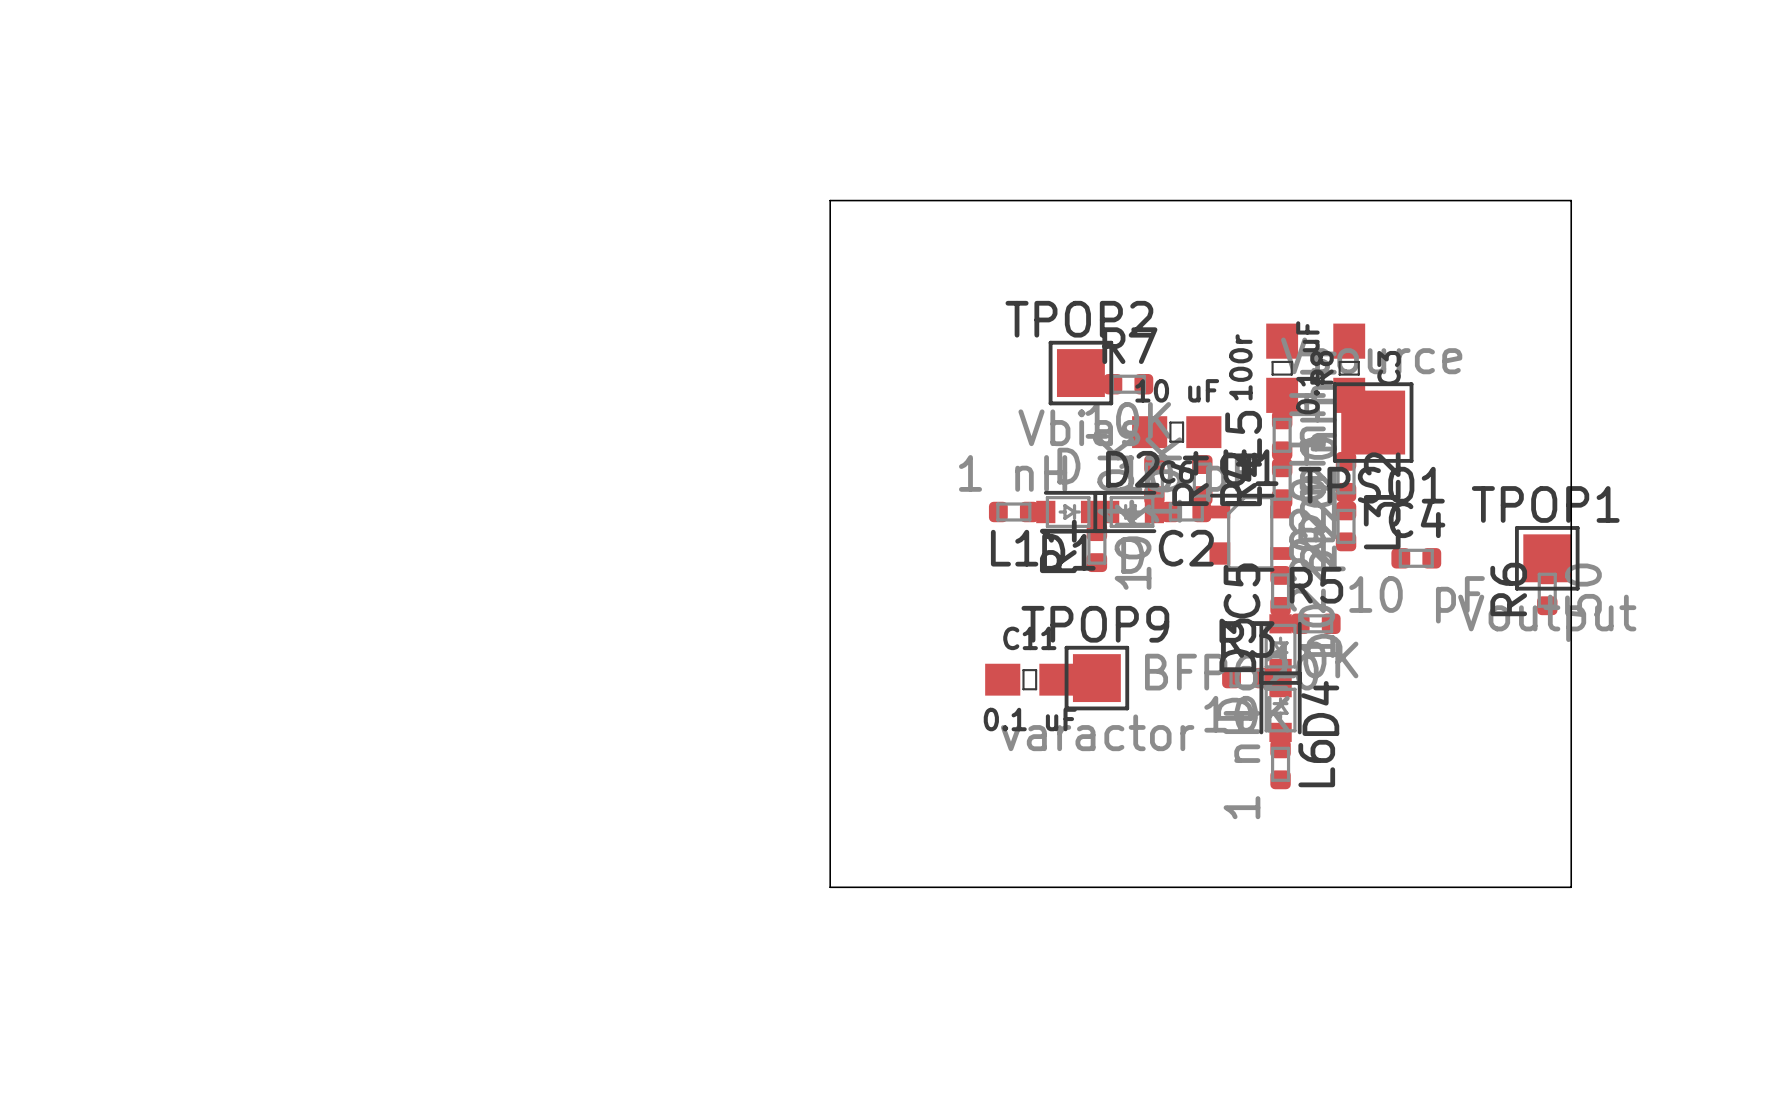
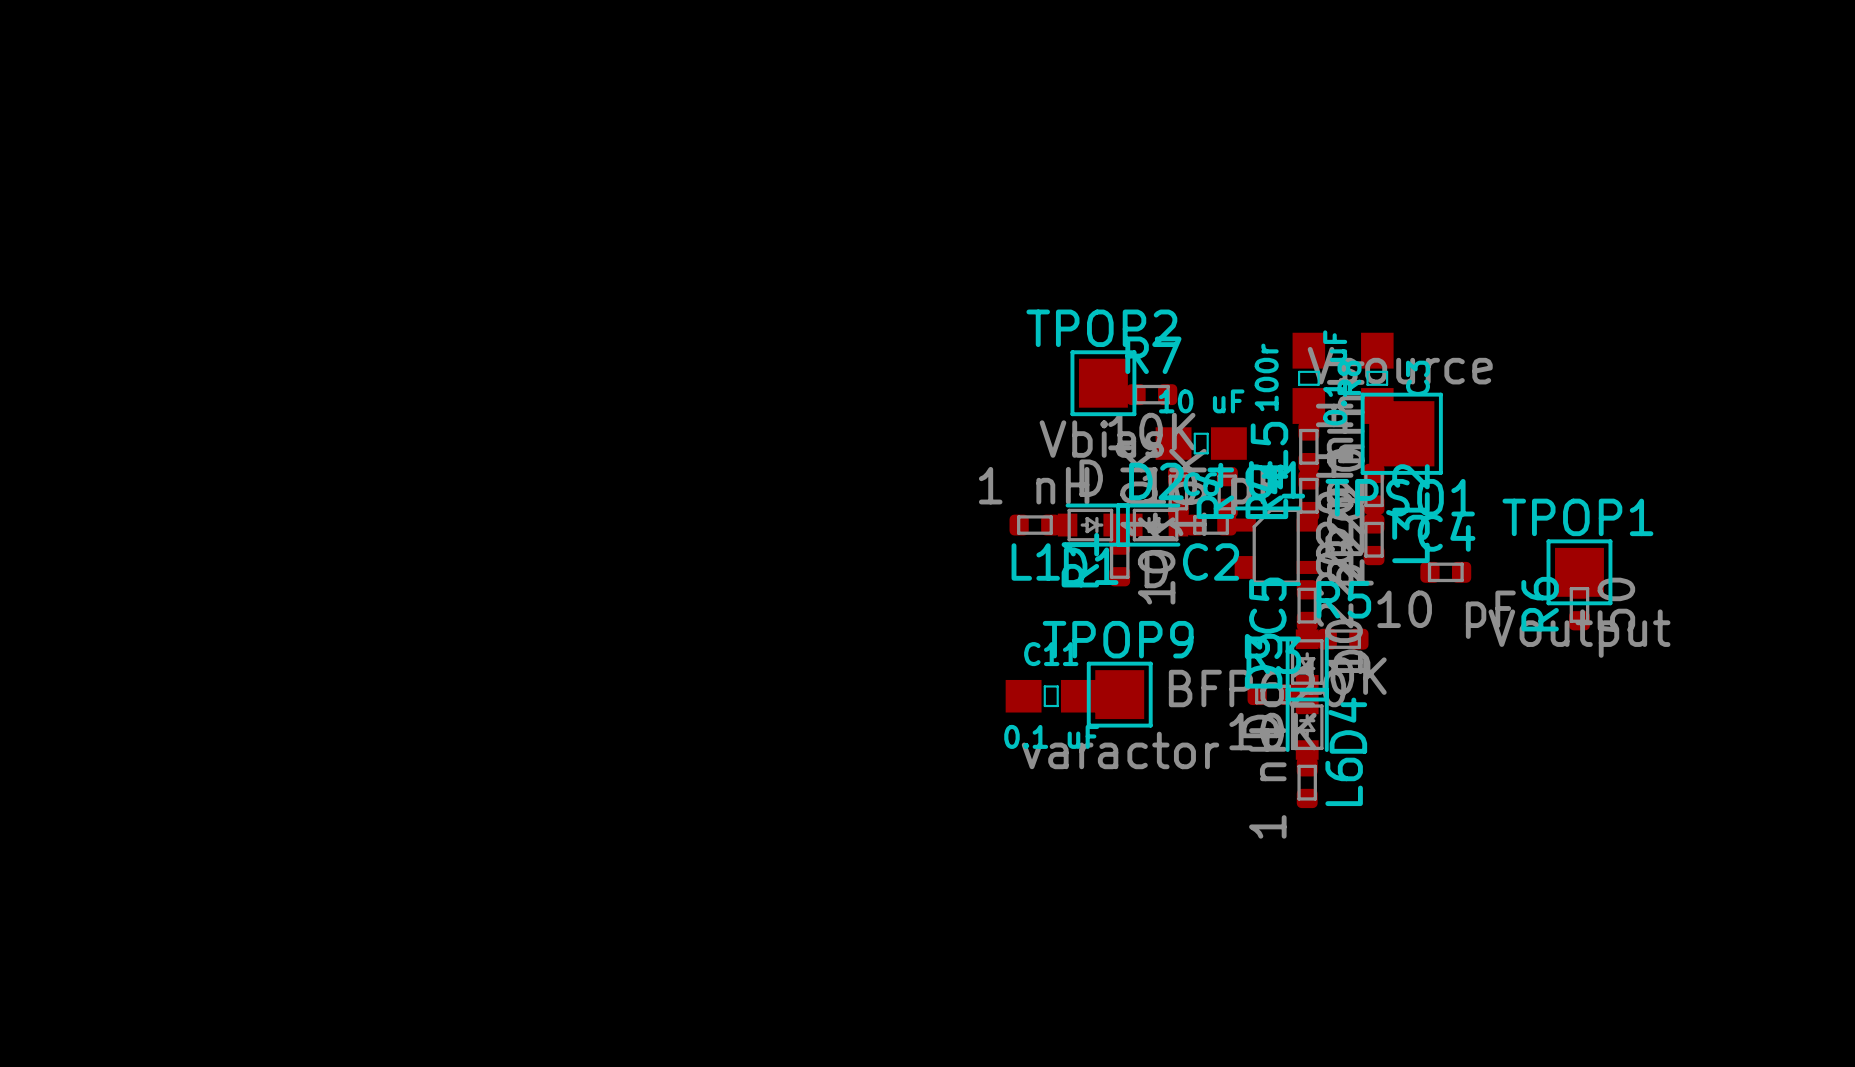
board edge: (830, 200) (830, 887) (1571, 887) (1571, 200) (830, 200) -> none

